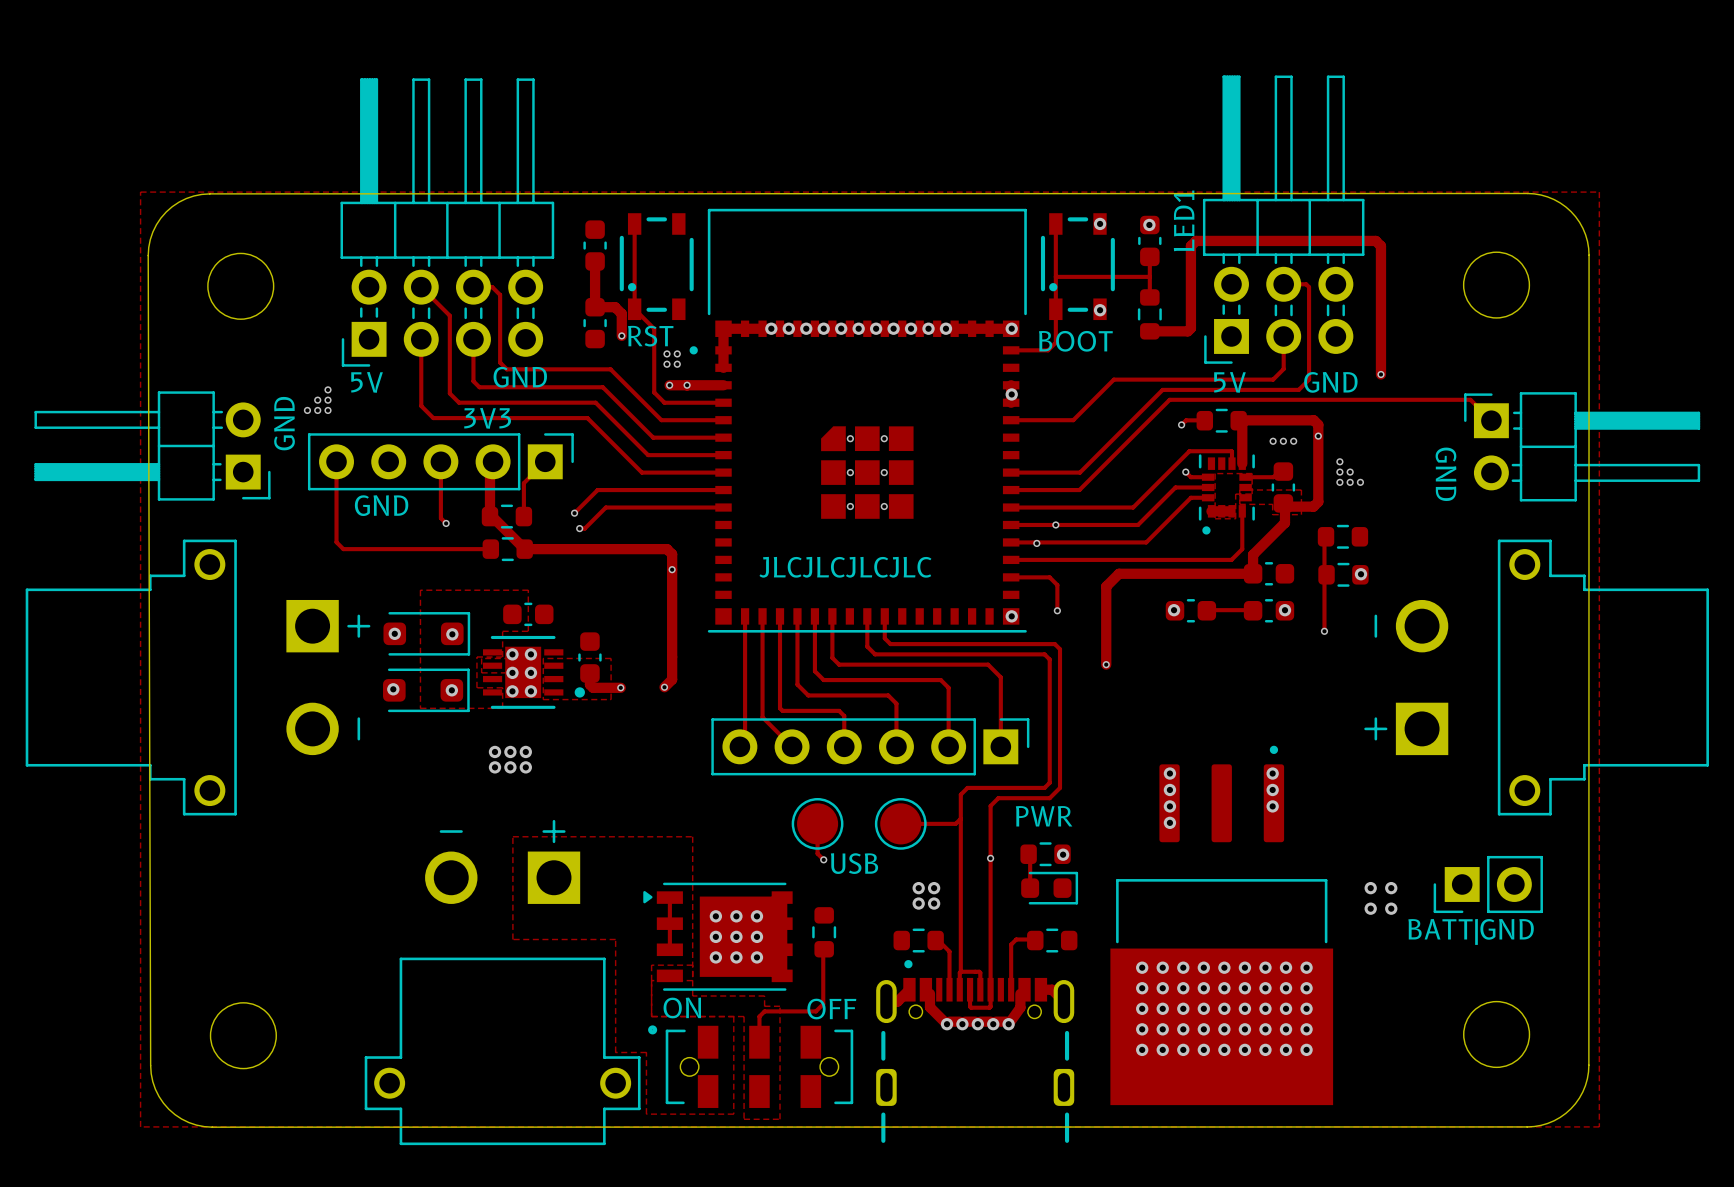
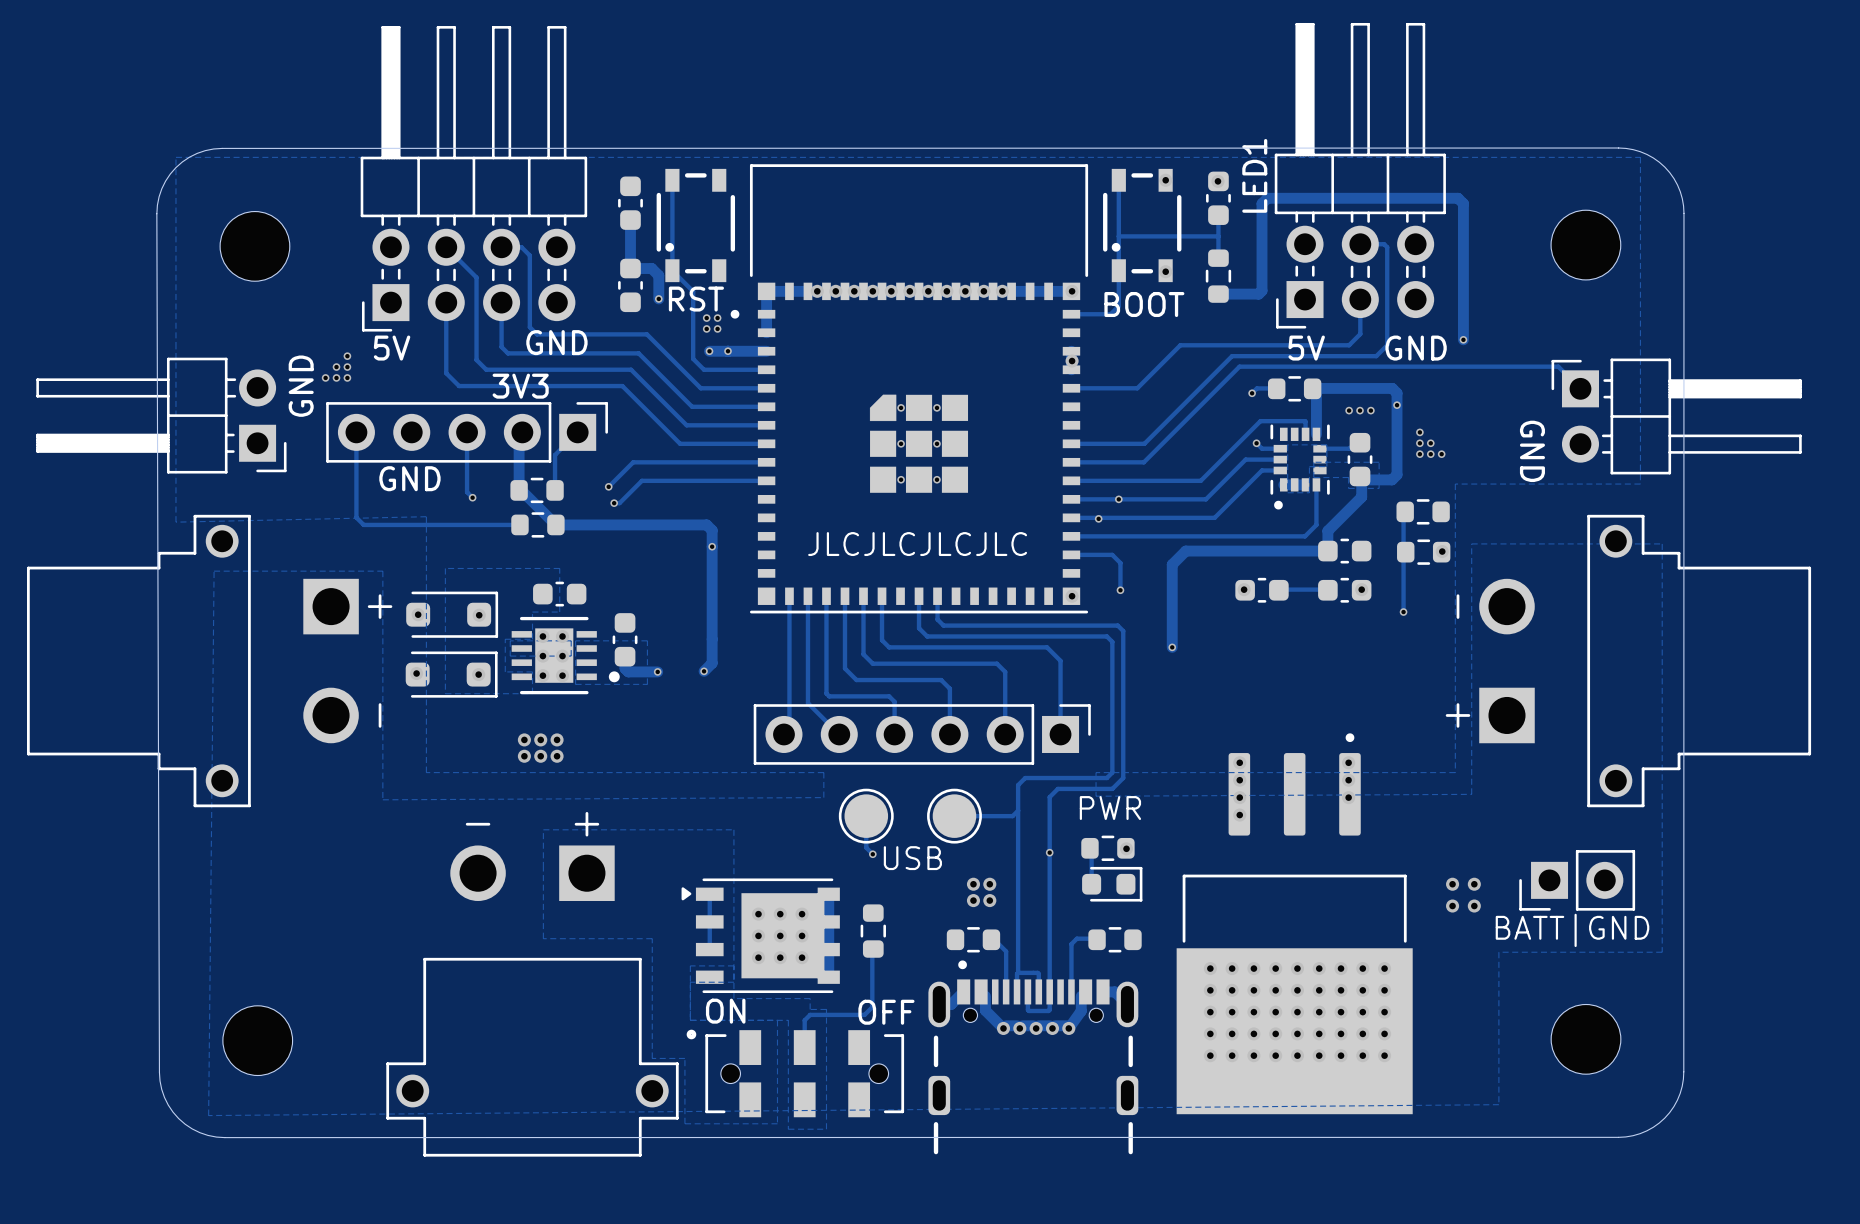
zone outline: (140, 192) (140, 1126) (1599, 1126) (1599, 192) (140, 192) -> (175, 157) (175, 522) (426, 516) (426, 772) (823, 772) (823, 797) (382, 799) (382, 571) (214, 571) (208, 1115) (1498, 1104) (1498, 952) (1662, 952) (1662, 543) (1471, 543) (1471, 794) (1096, 796) (1096, 772) (1455, 772) (1455, 484) (1640, 484) (1640, 157) (175, 157)

